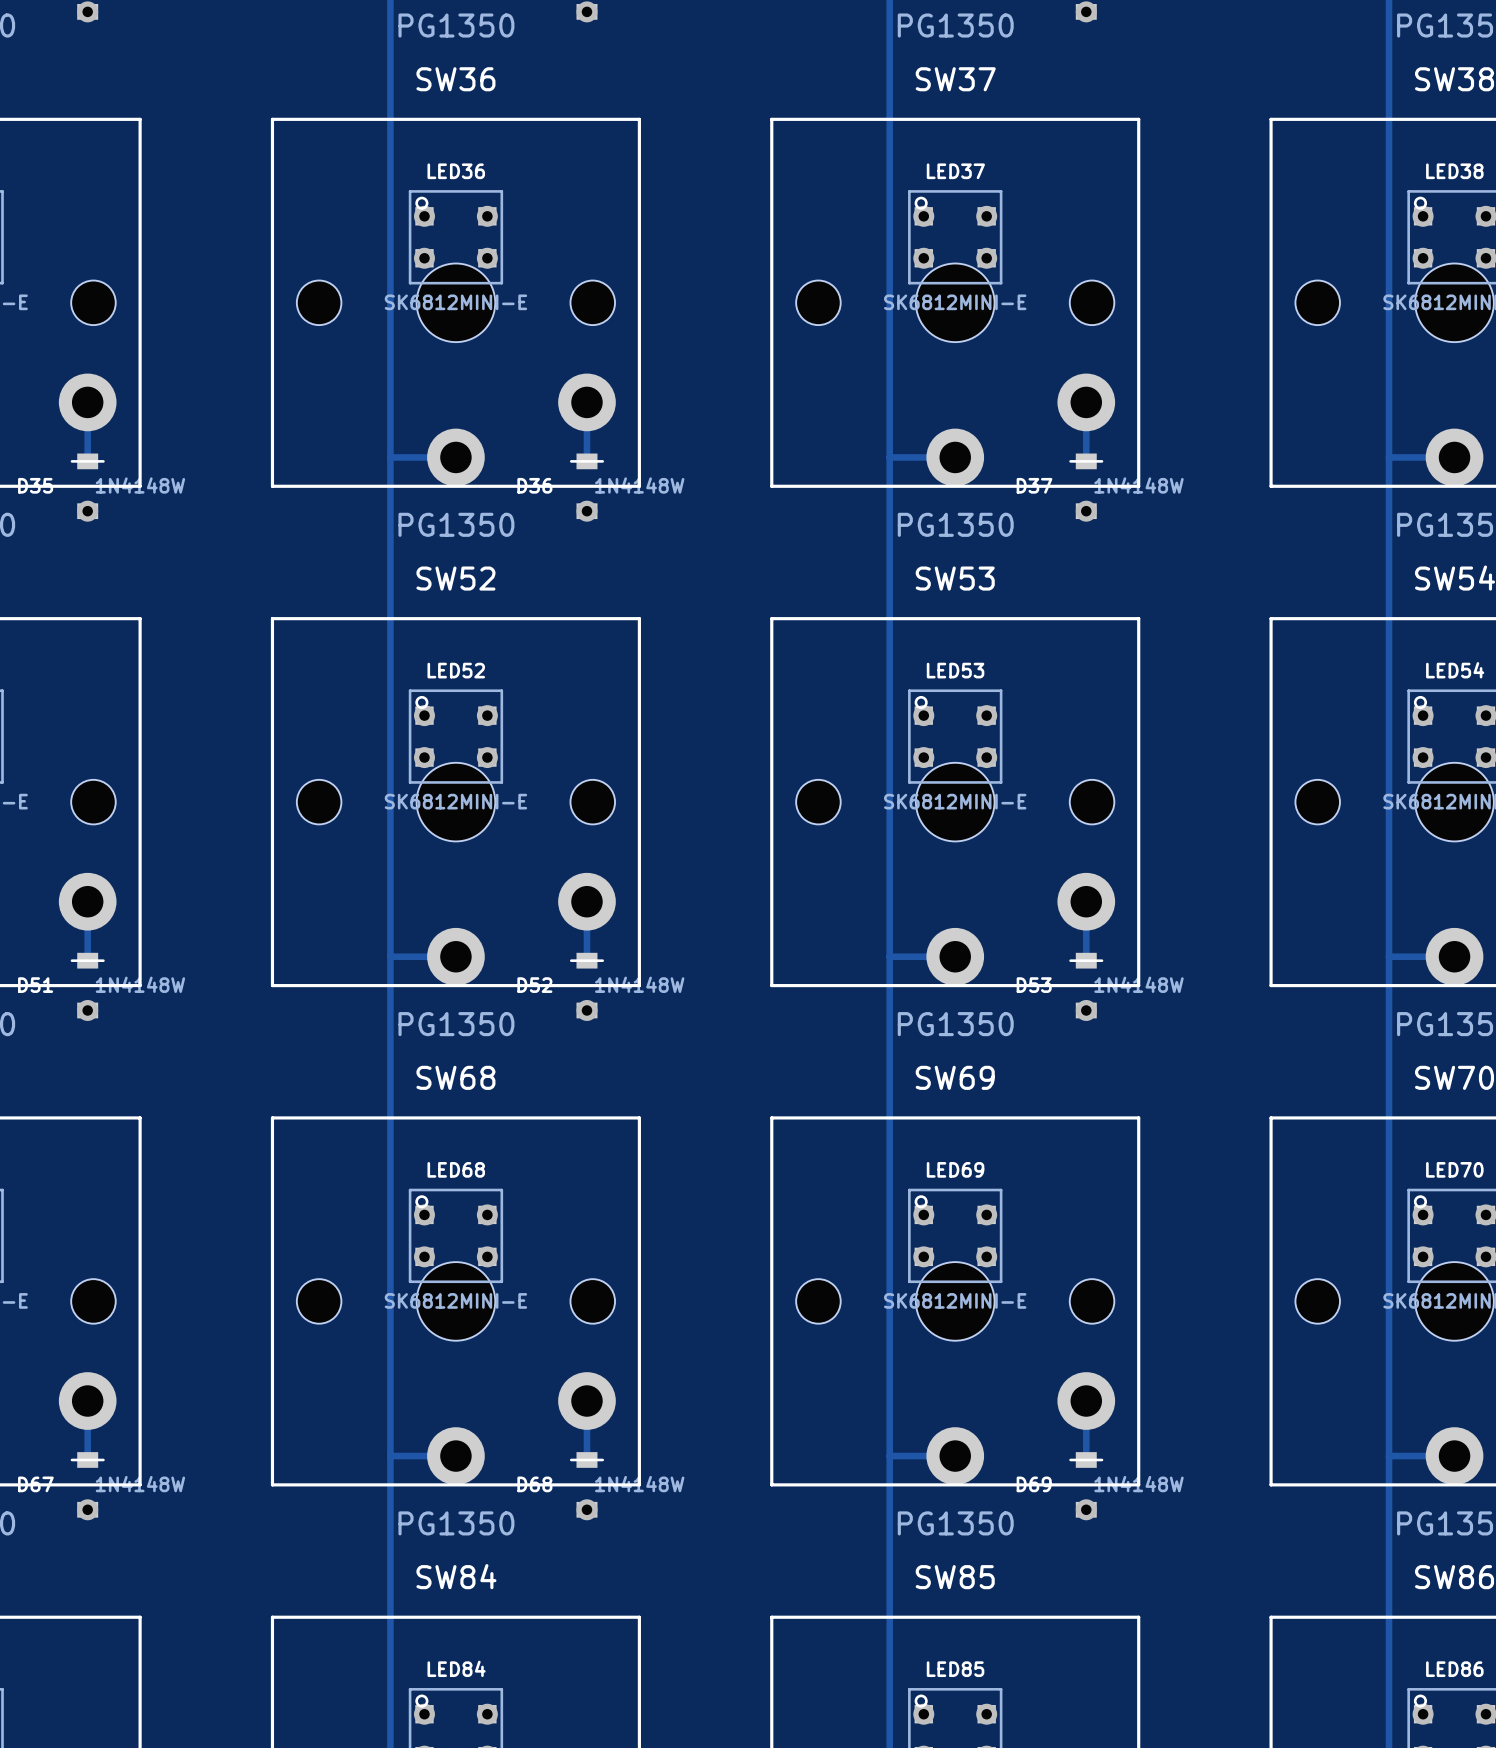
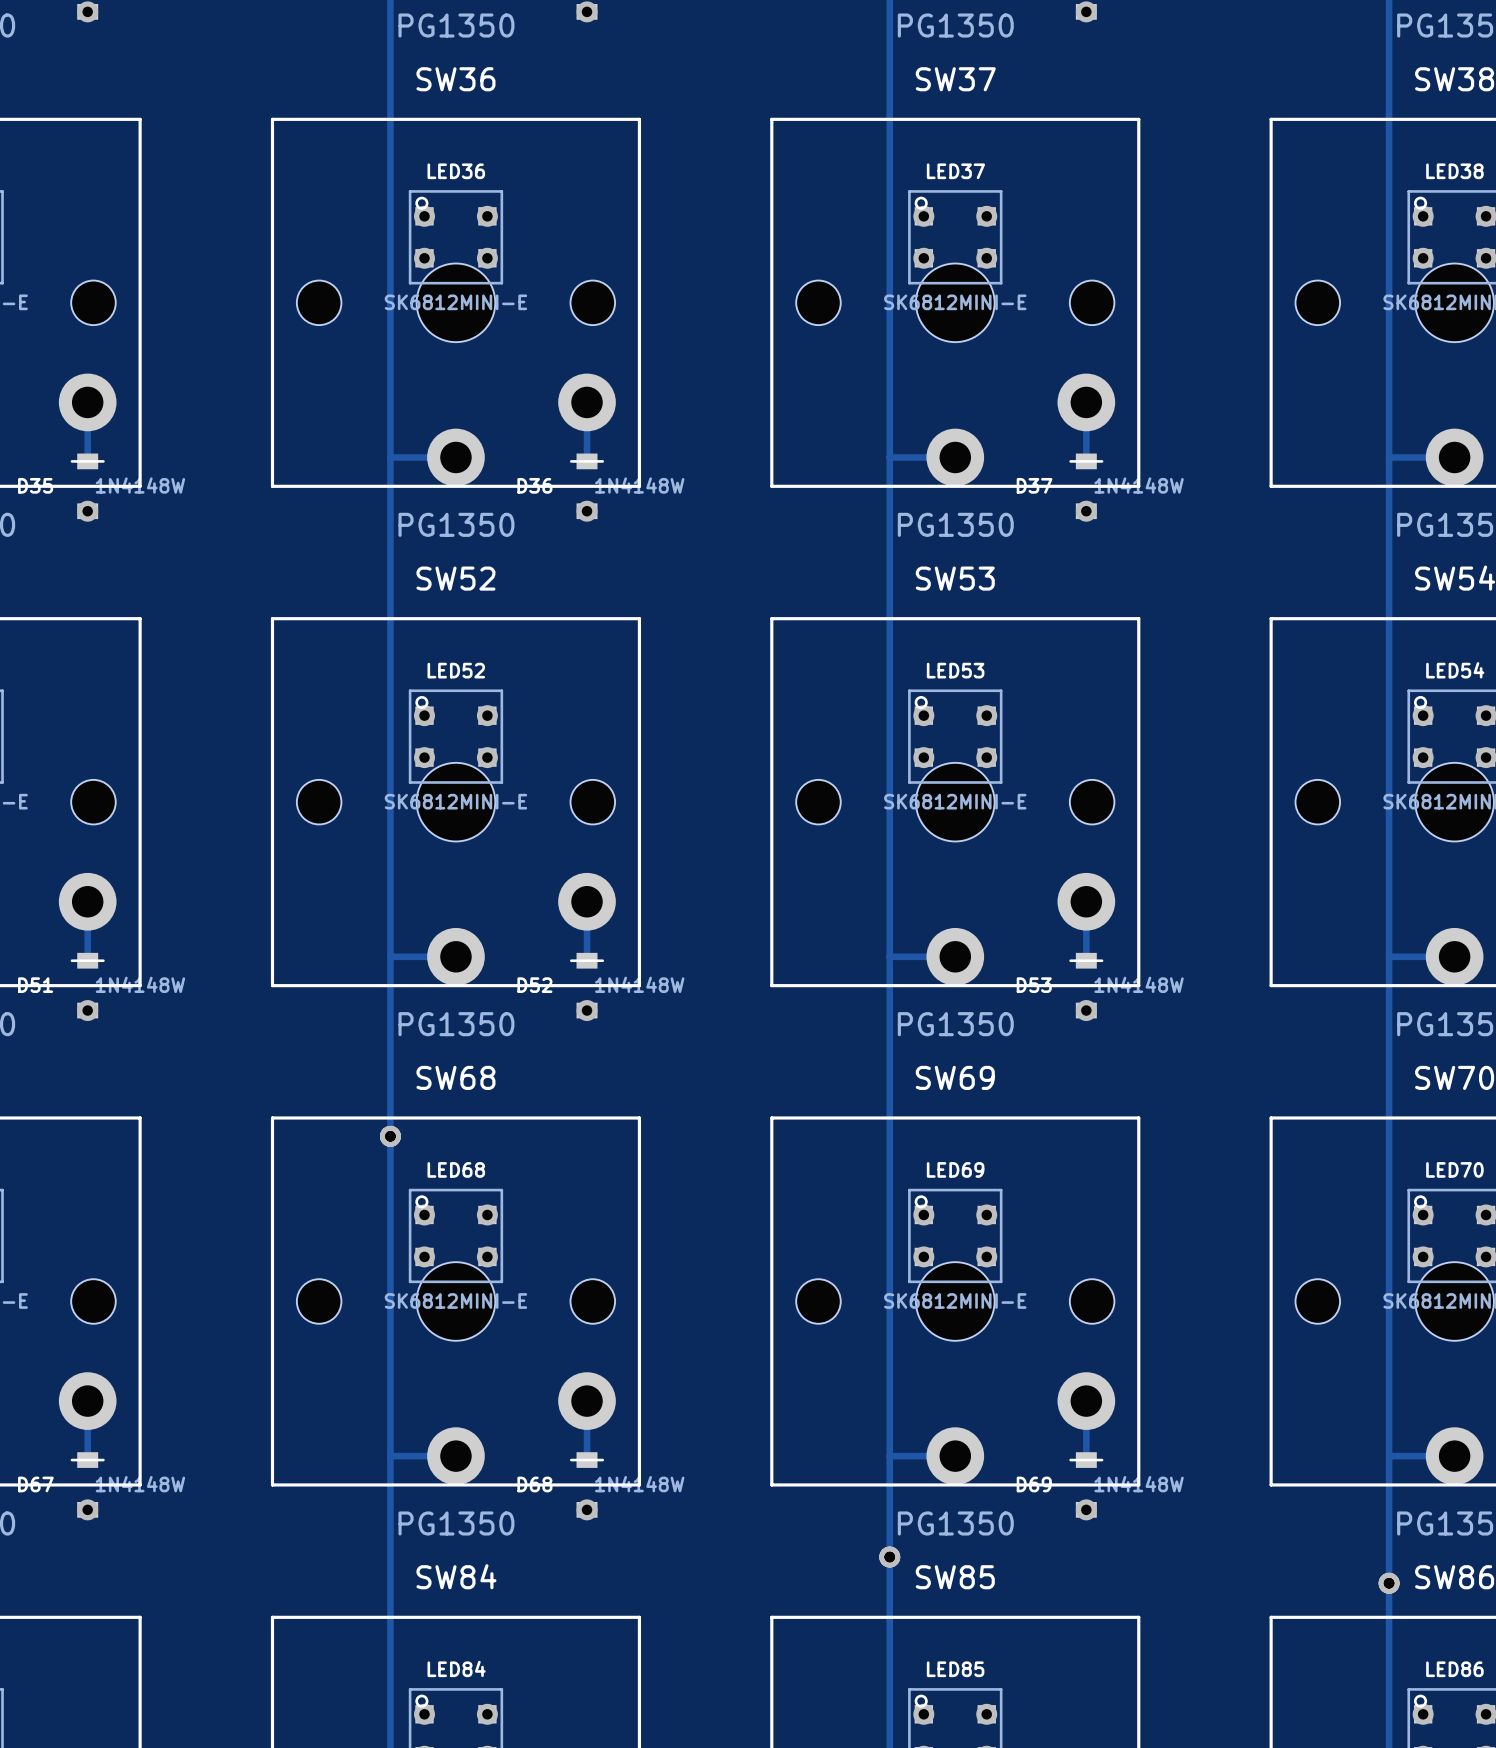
via: none -> (390, 1136)
via: none -> (889, 1557)
via: none -> (1389, 1583)

